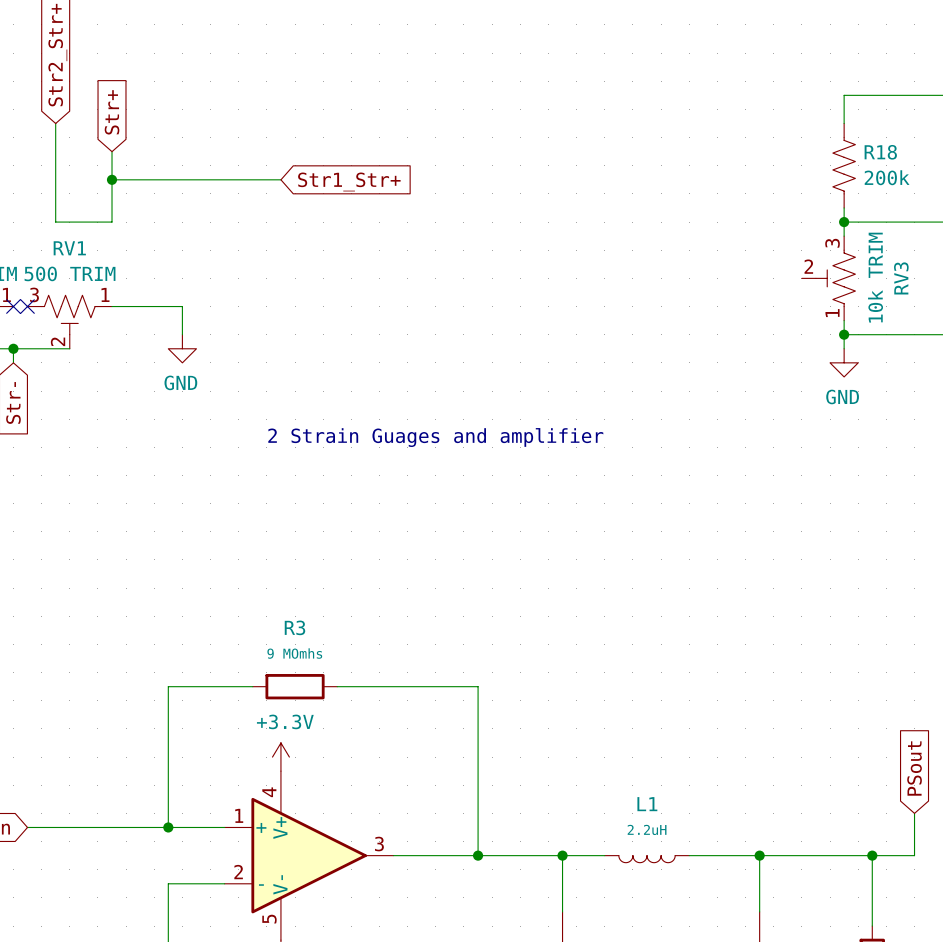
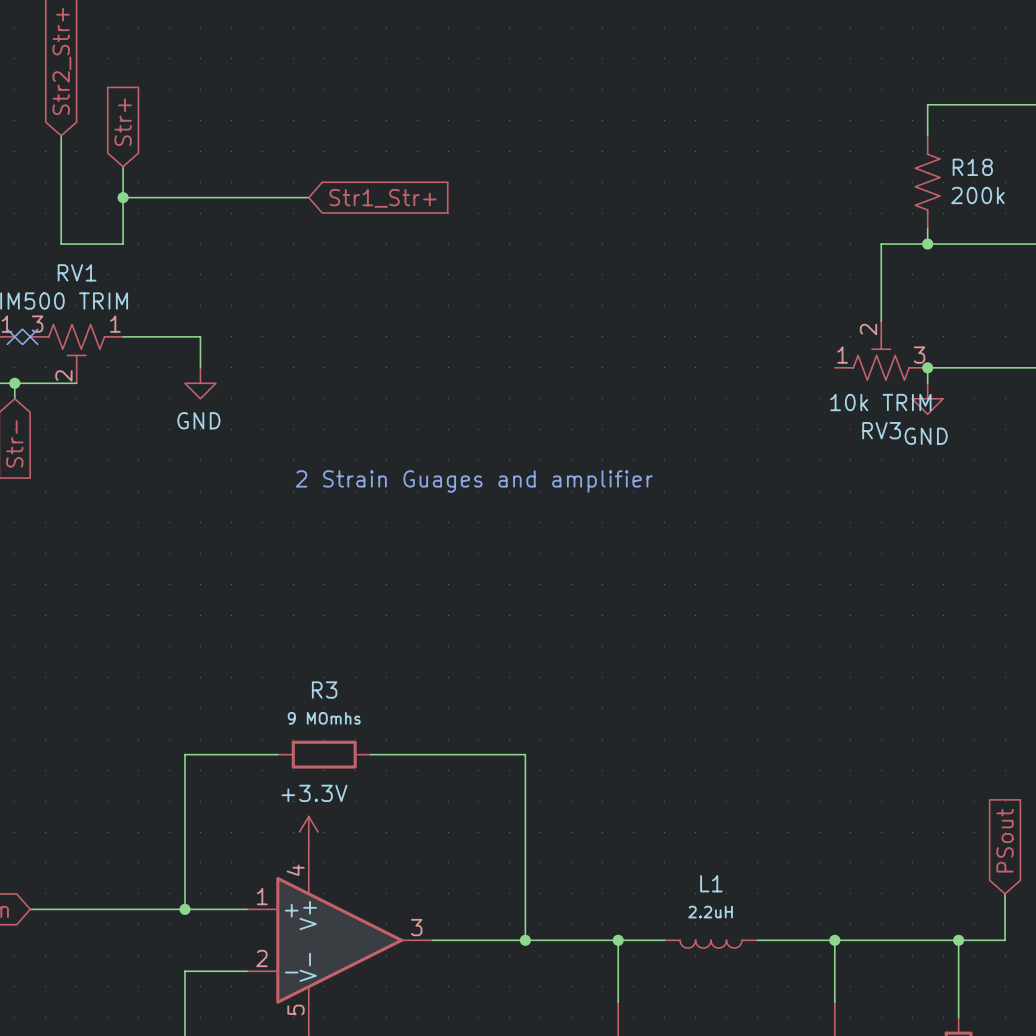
wire: (844, 222) (844, 236) -> (927, 244) (881, 244) (881, 321)
RV3 rotation: 0° (835, 278) -> 90° clockwise (881, 358)
wire: (844, 320) (844, 334) -> none

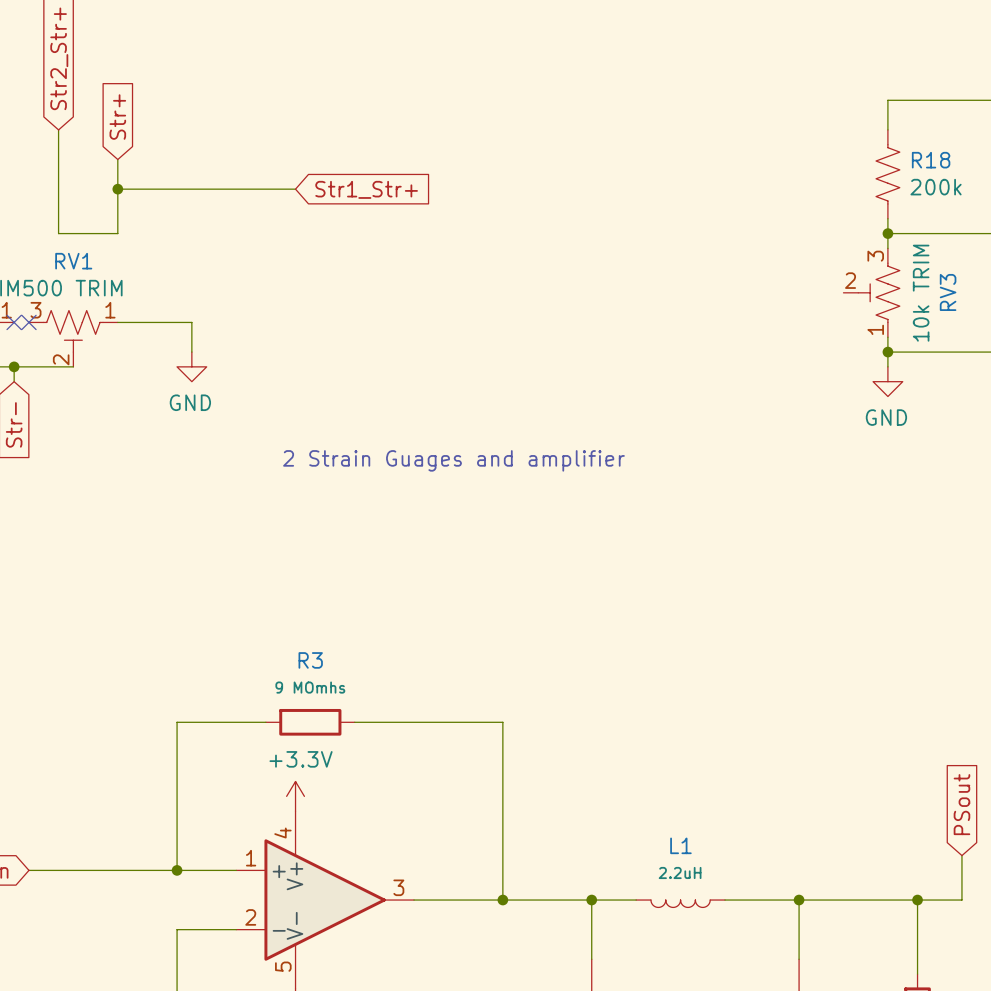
wire: (927, 244) (881, 244) (881, 321) -> (887, 233) (887, 248)
wire: none -> (887, 337) (887, 352)
RV3 rotation: 0° (881, 358) -> 90° counterclockwise (879, 292)

